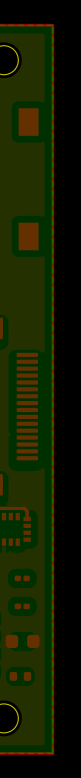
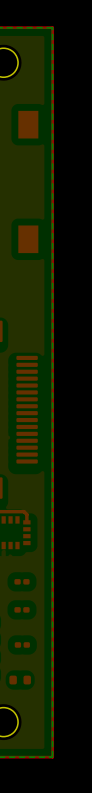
part footprint: [5, 634, 40, 648] -> [14, 642, 30, 648]

